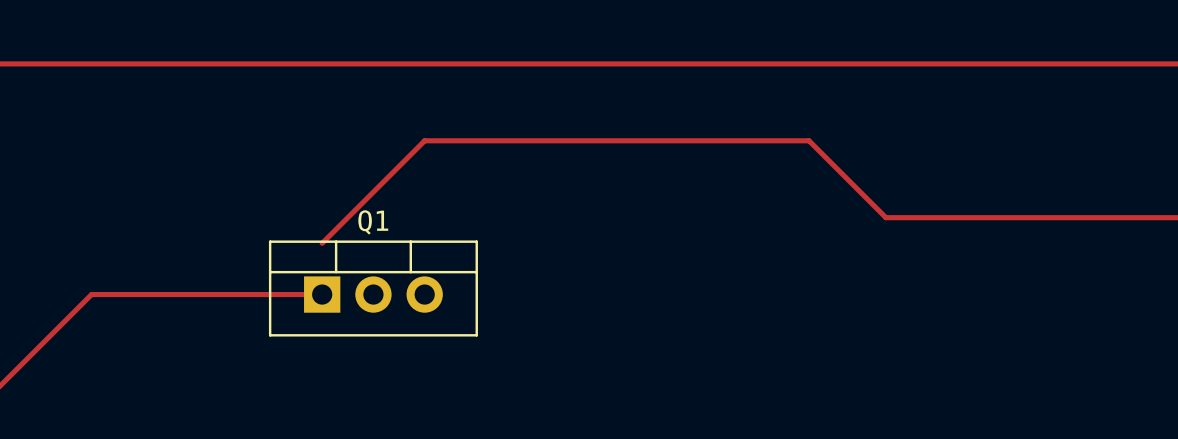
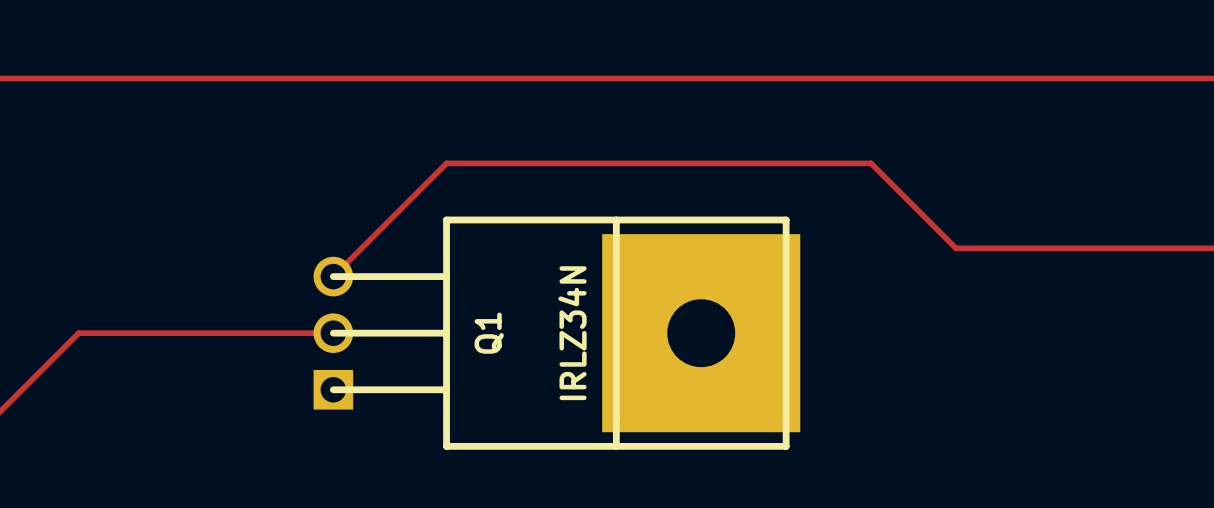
Q1 name position: Q1 (373, 222) -> Q1 (489, 333)
Q1 footprint: [268, 240, 478, 337] -> [313, 216, 801, 450]
Q1 value: none -> IRLZ34N (572, 333)

